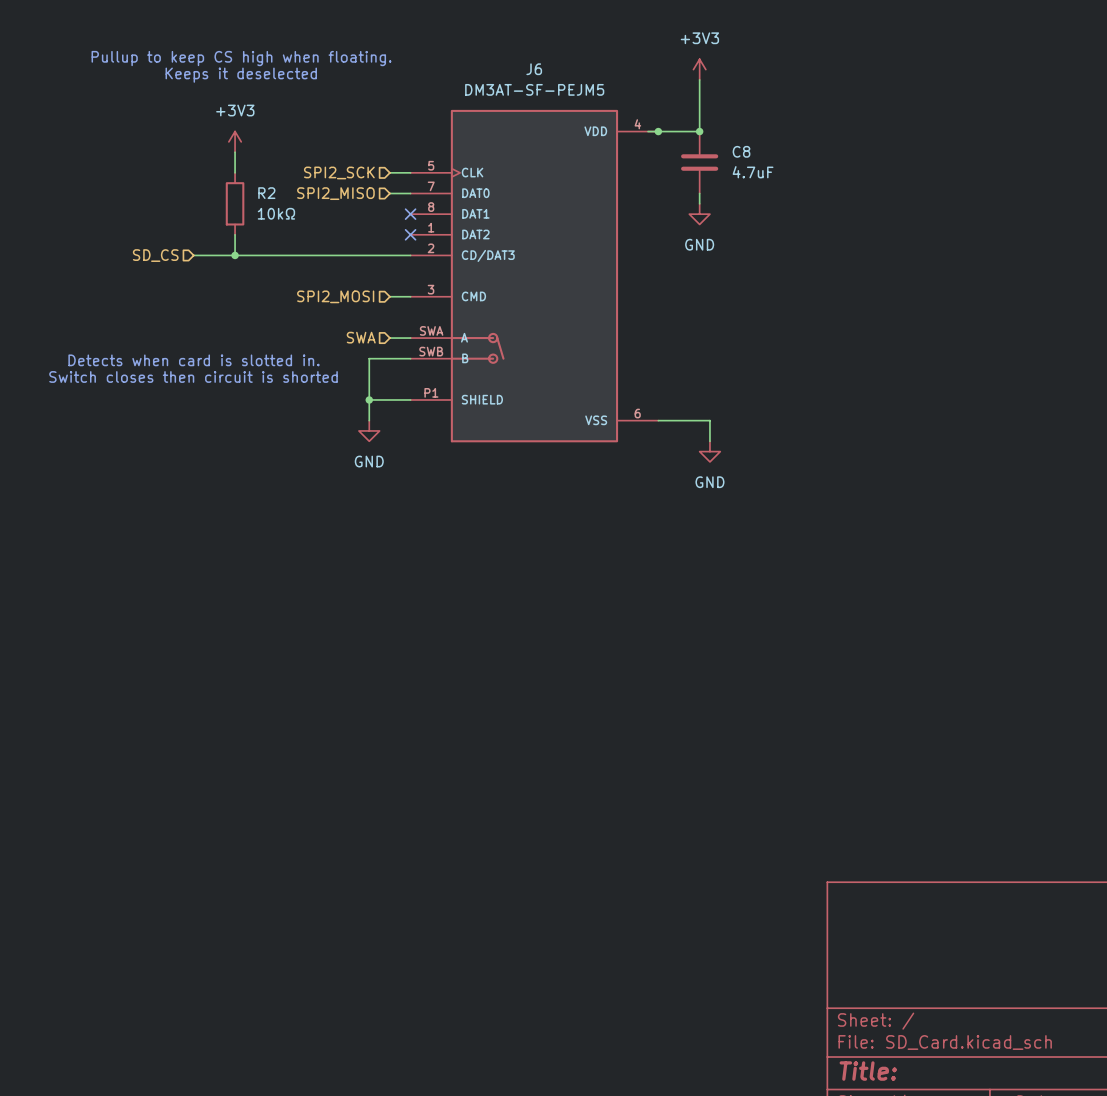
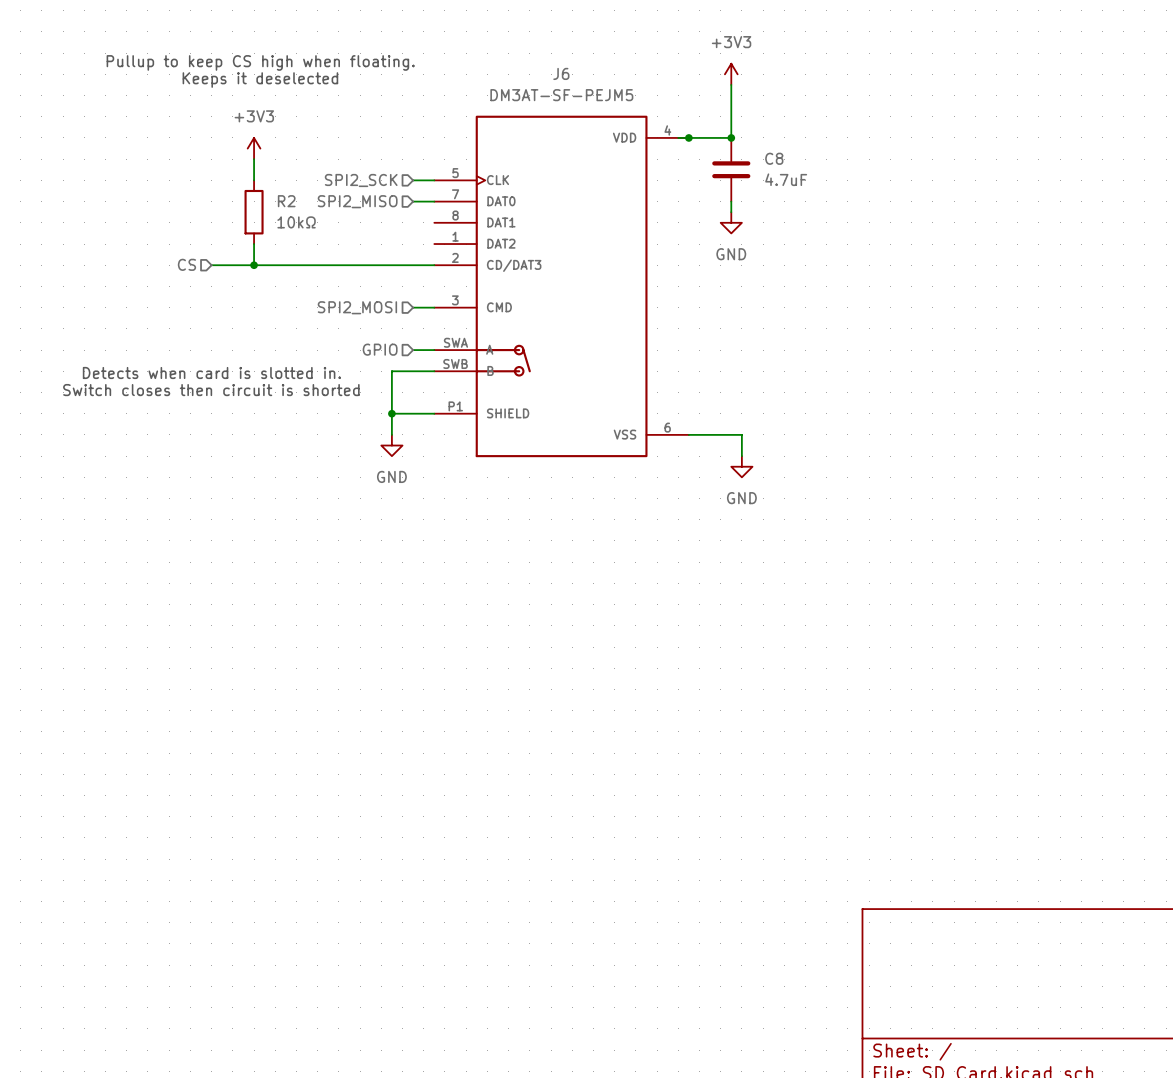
no-connect mark: (410, 214) -> none
no-connect mark: (410, 234) -> none
hierarchical label: SD_CS (155, 255) -> CS (186, 264)
hierarchical label: SWA (361, 337) -> GPIO (380, 349)

